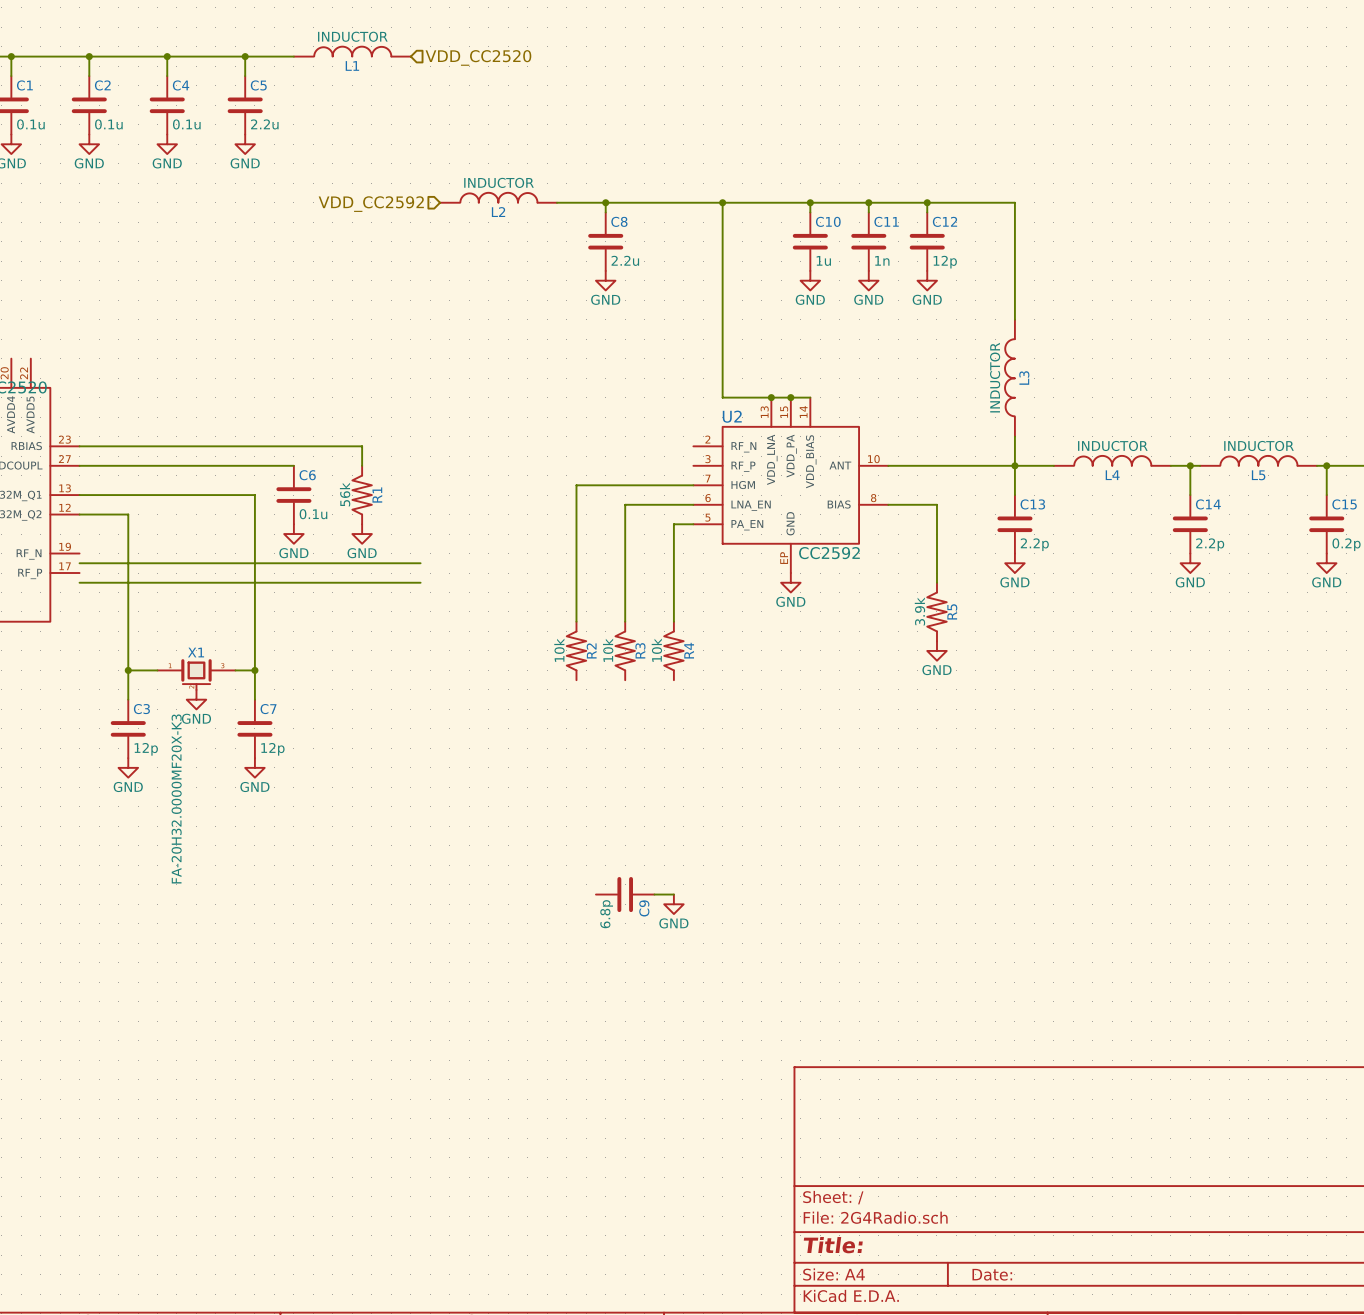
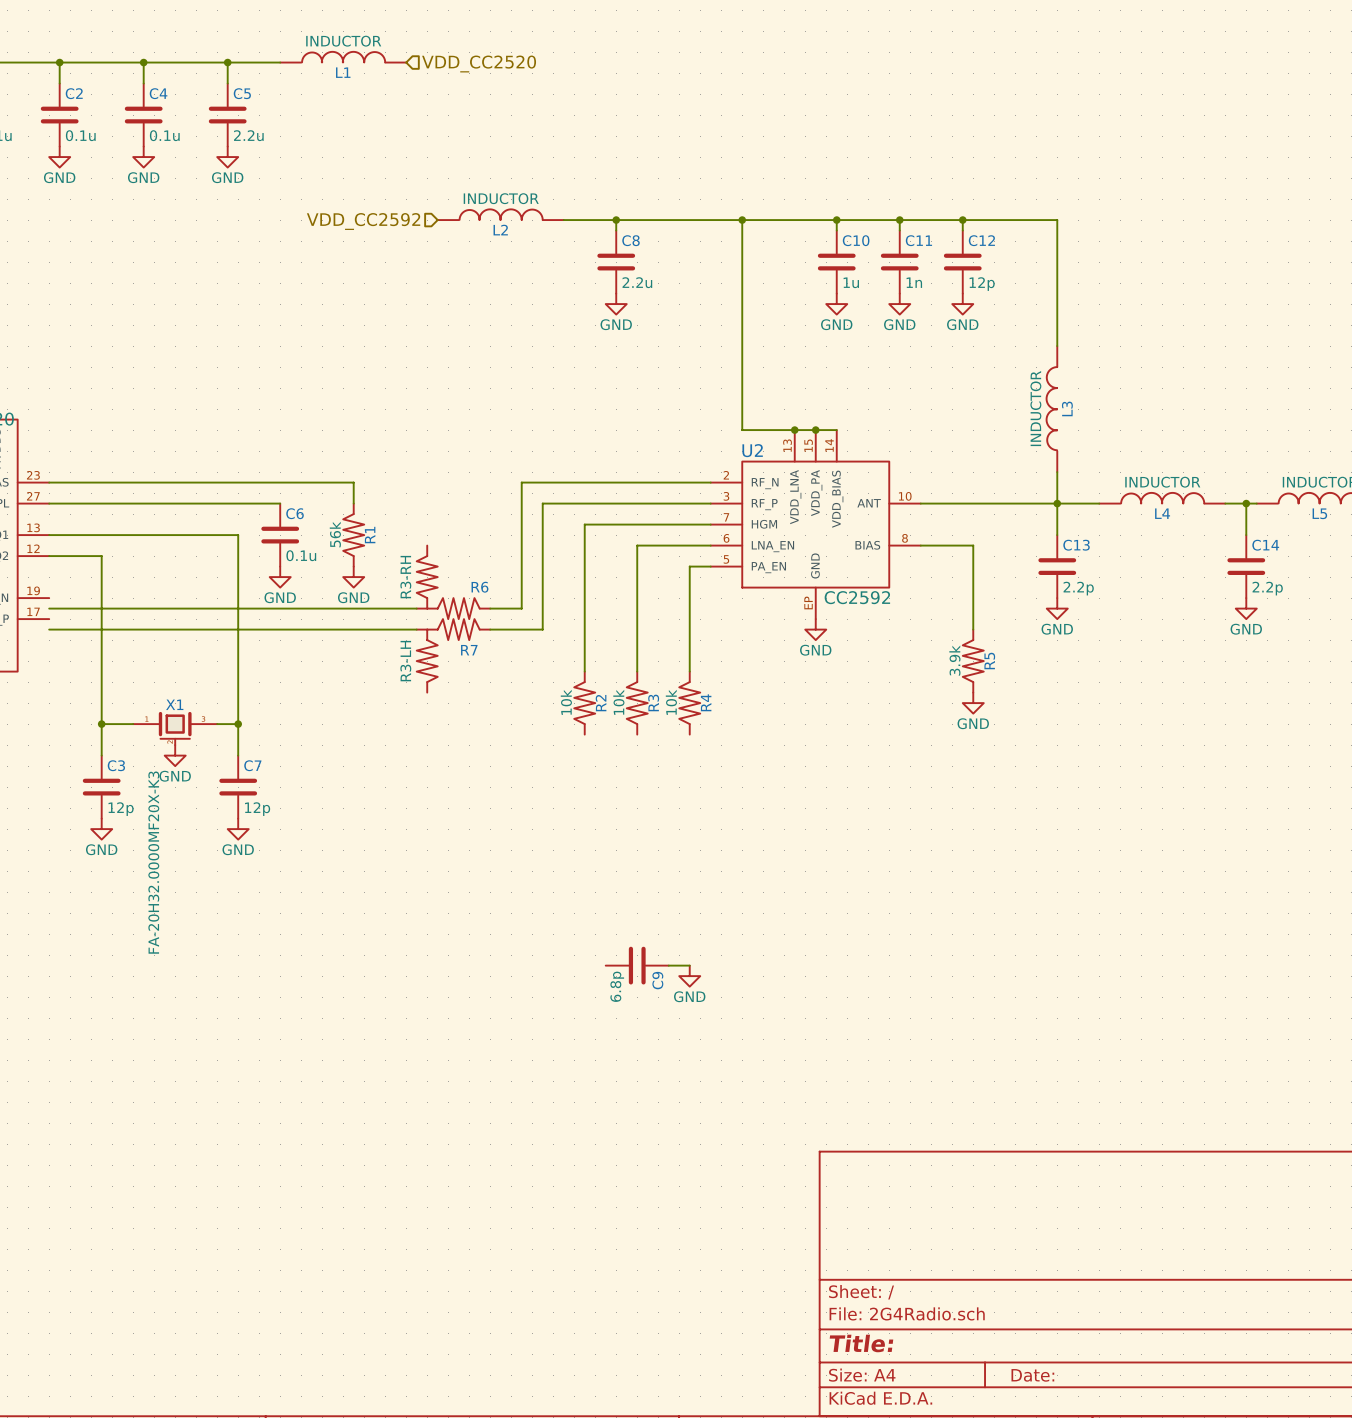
wire: none -> (710, 482) (521, 482) (521, 608) (490, 608)
wire: none -> (710, 503) (542, 503) (542, 629) (490, 629)
R6: none -> R3-RH (453, 582)
R7: none -> R3-LH (453, 655)

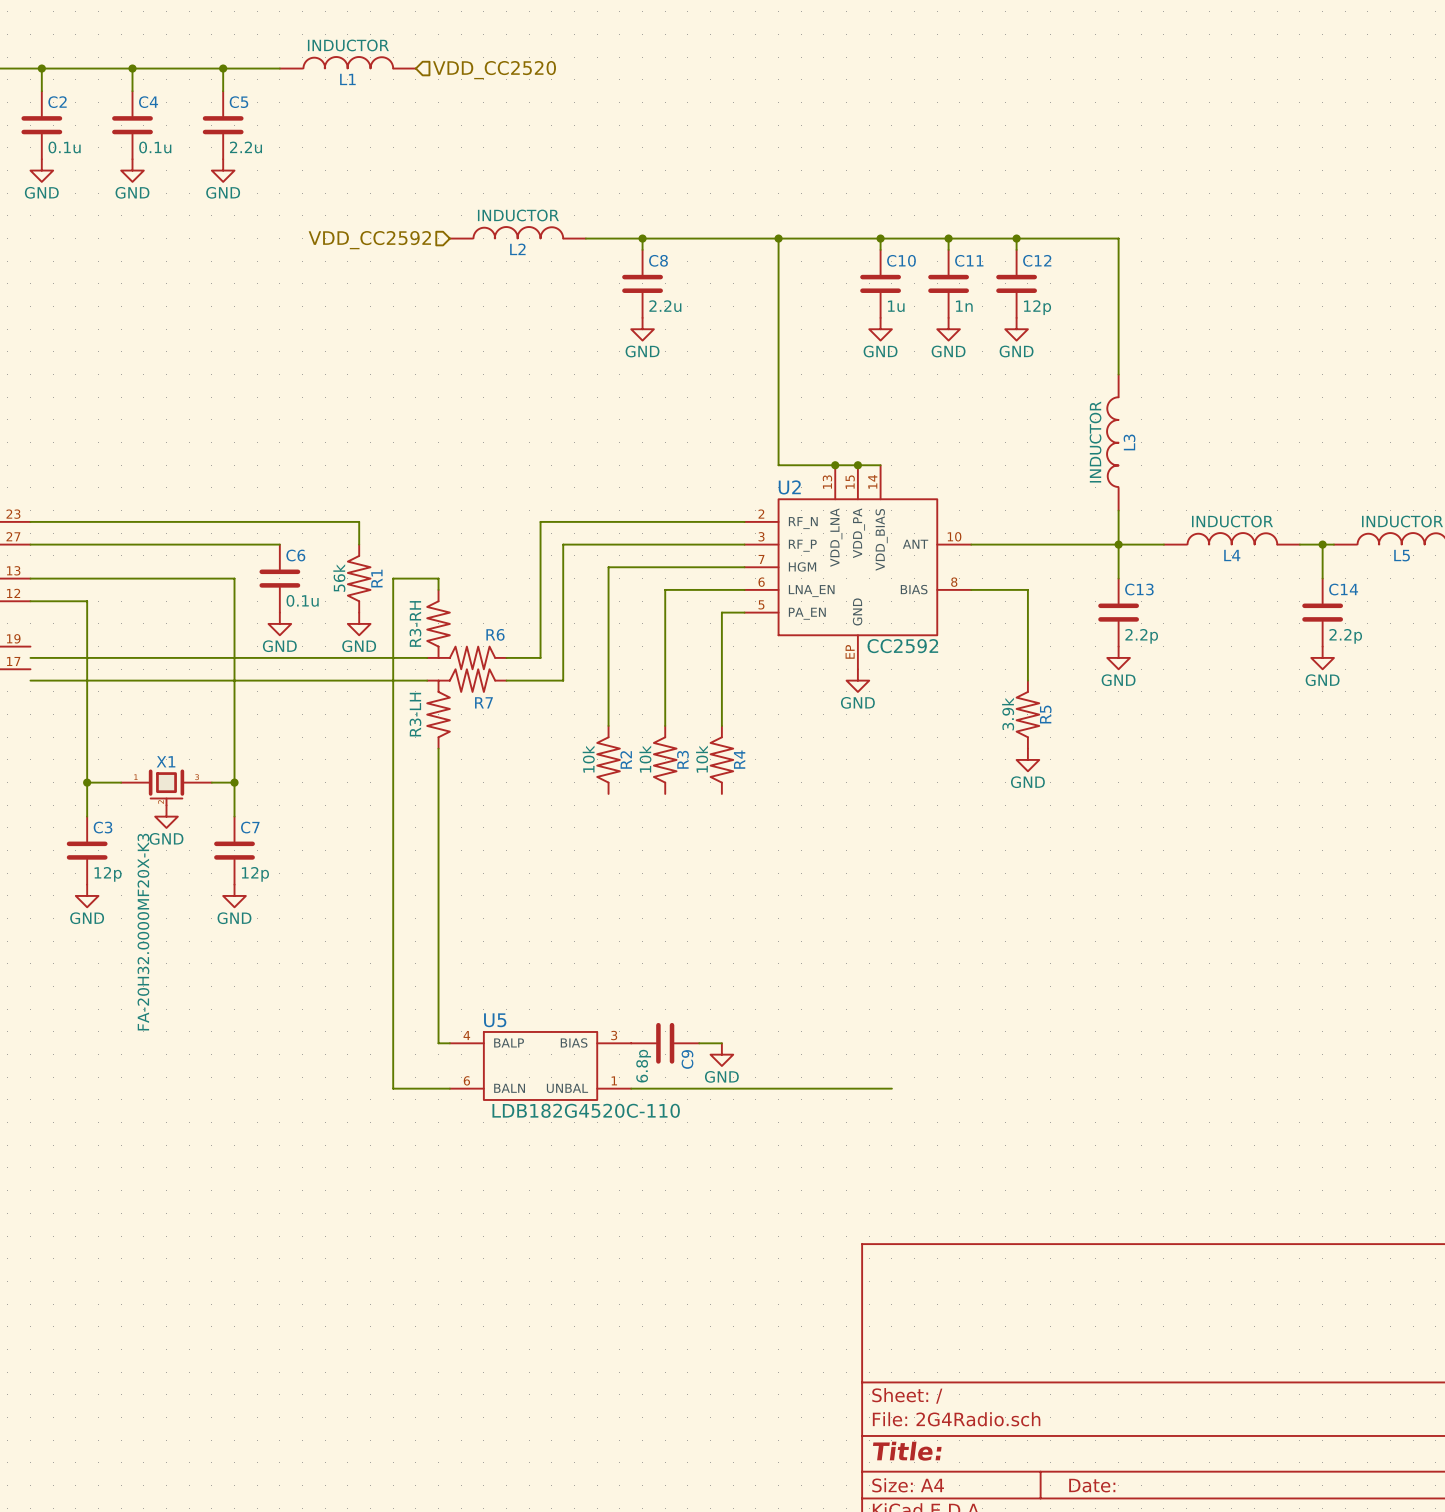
wire: none -> (438, 589) (438, 578) (393, 578) (393, 1088) (449, 1088)
wire: none -> (438, 748) (438, 1043) (449, 1043)
U5: none -> LDB182G4520C-110 (540, 1065)
wire: none -> (631, 1088) (891, 1088)

